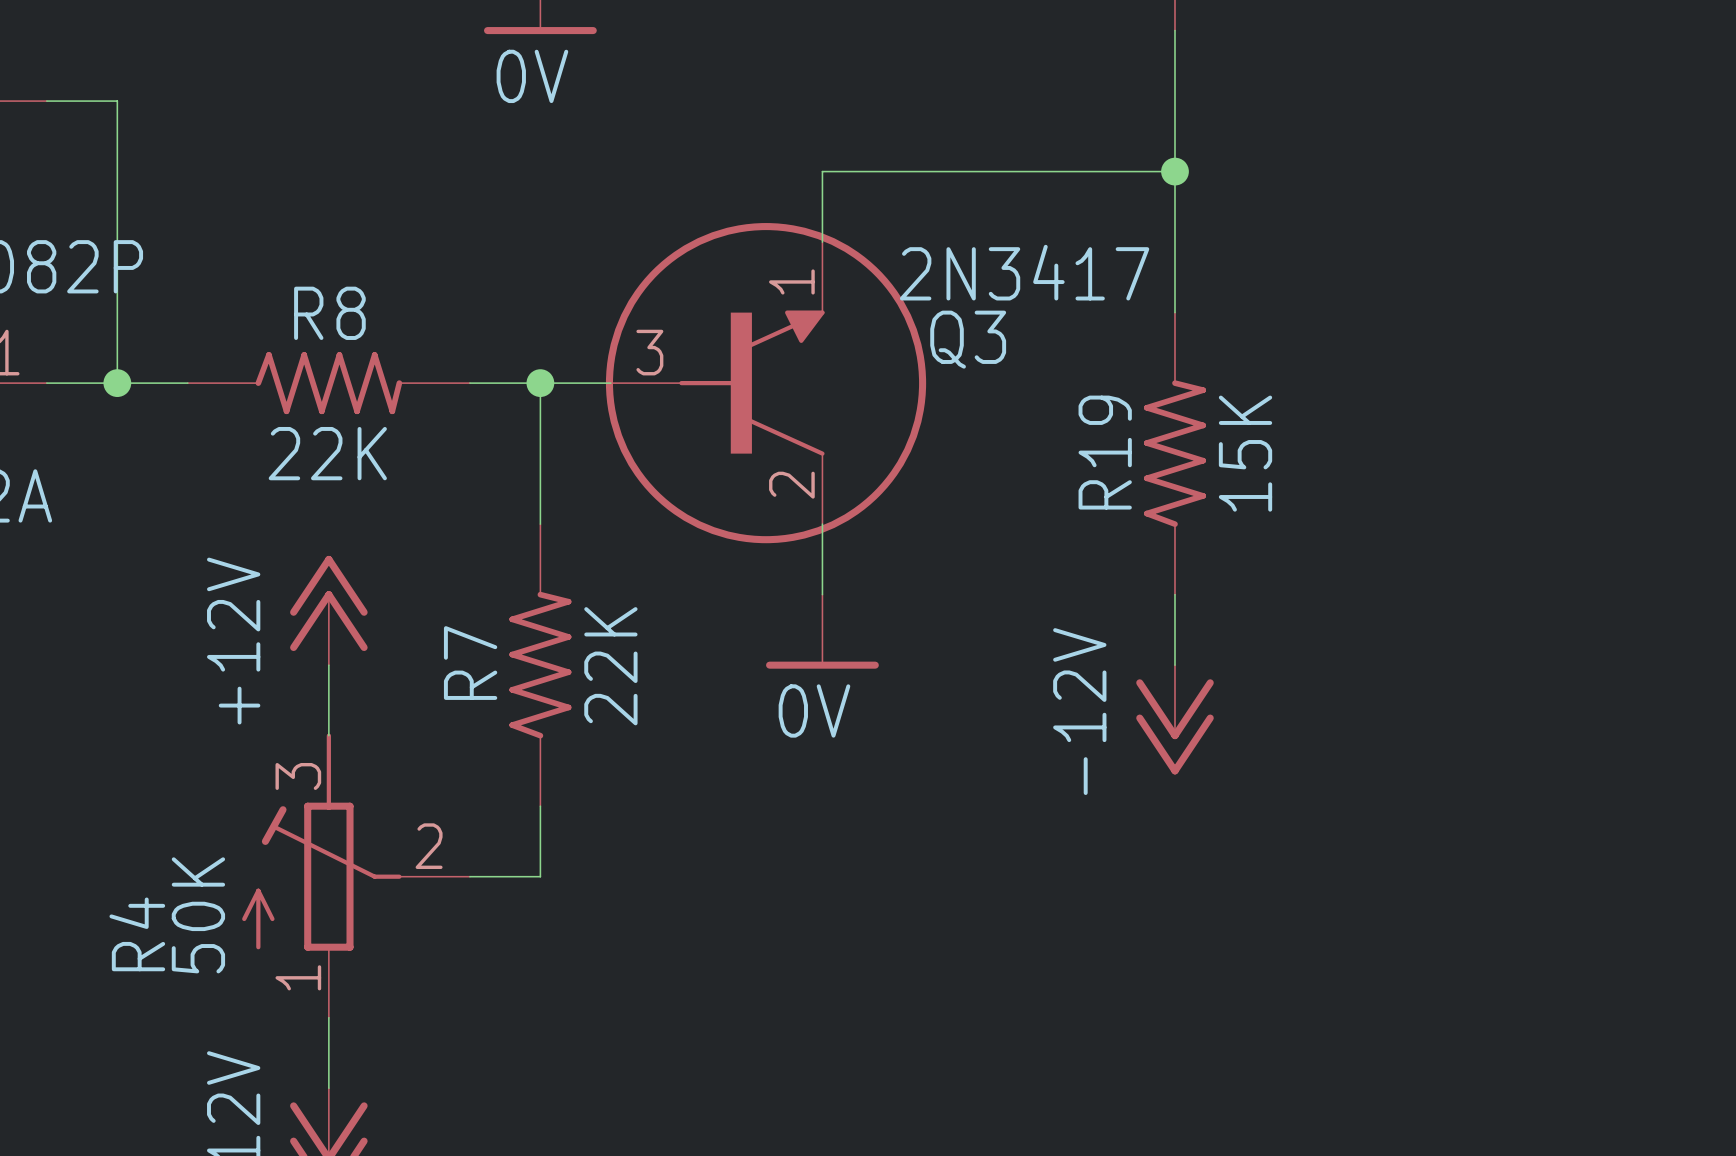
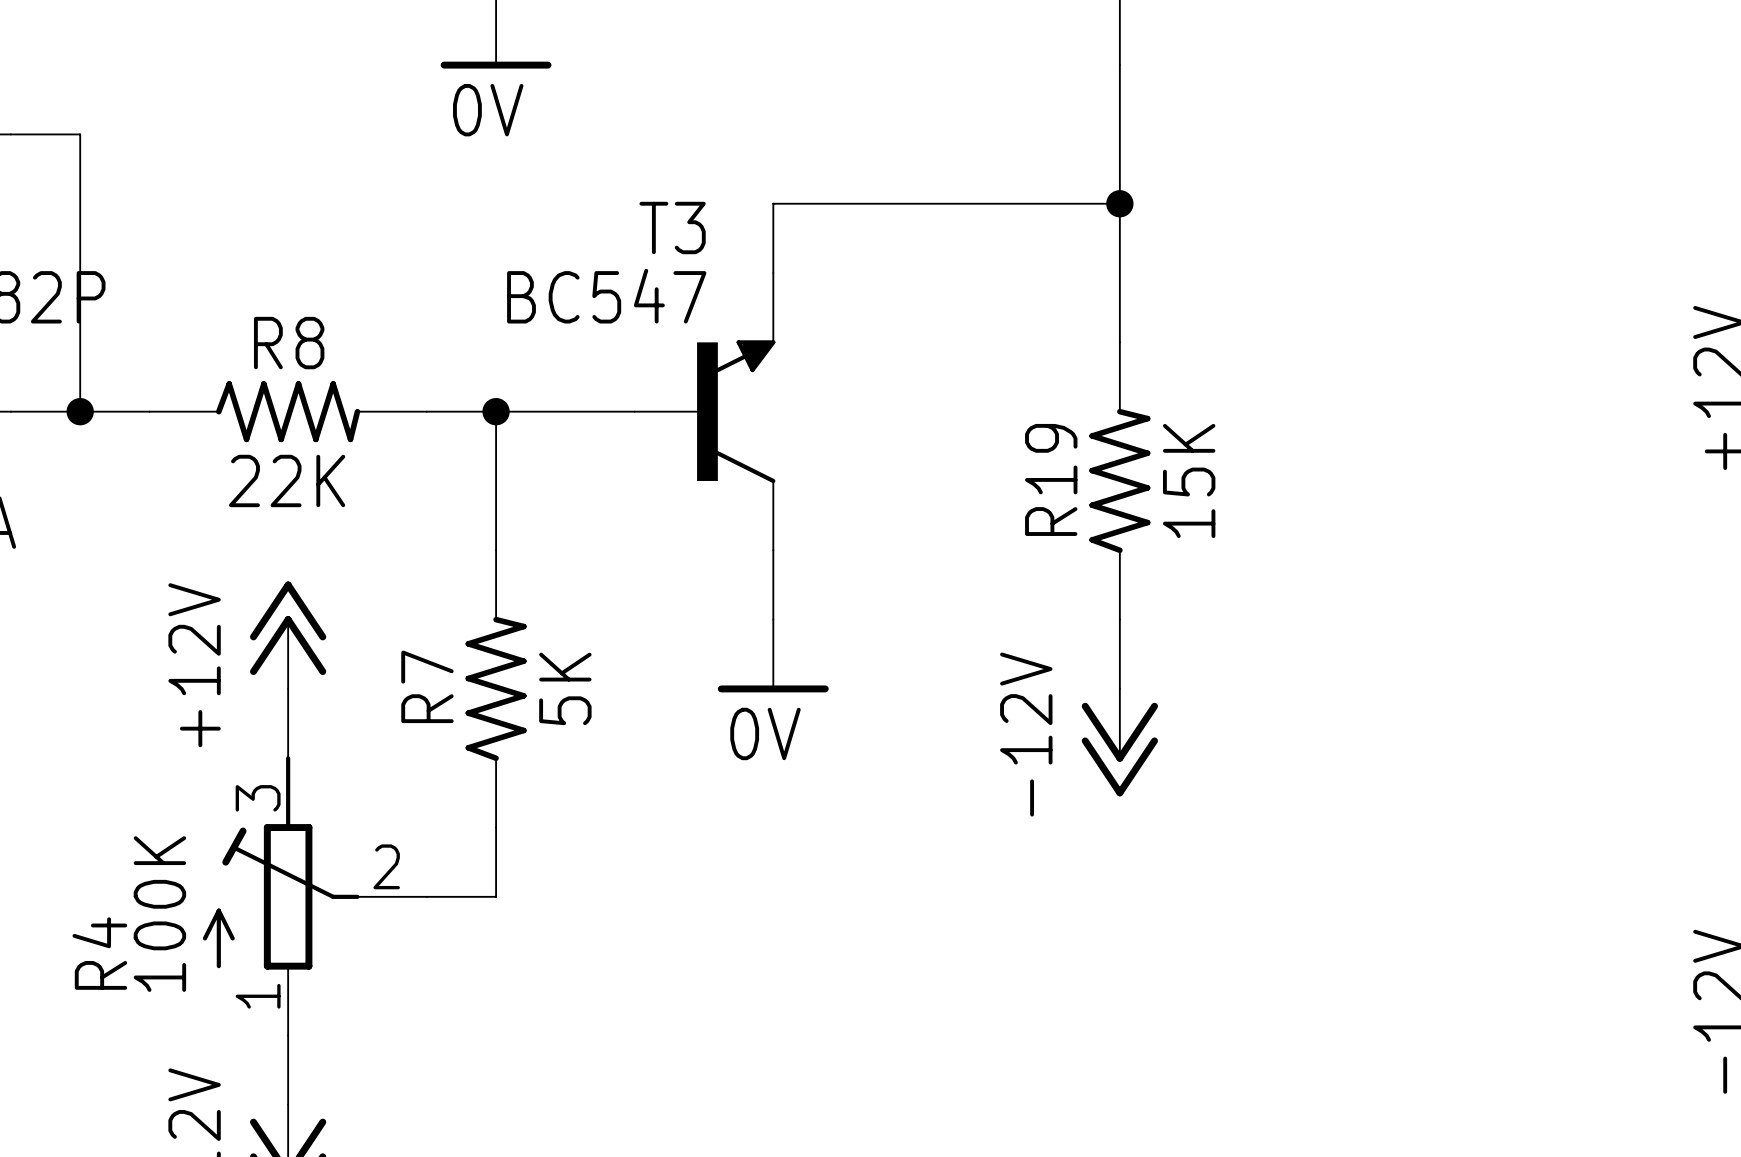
T3: none -> BC547 (705, 411)
Q3: 2N3417 (766, 383) -> none
R7 value: 22K (610, 666) -> 5K (565, 688)
R4 value: 50K (198, 915) -> 100K (159, 914)

